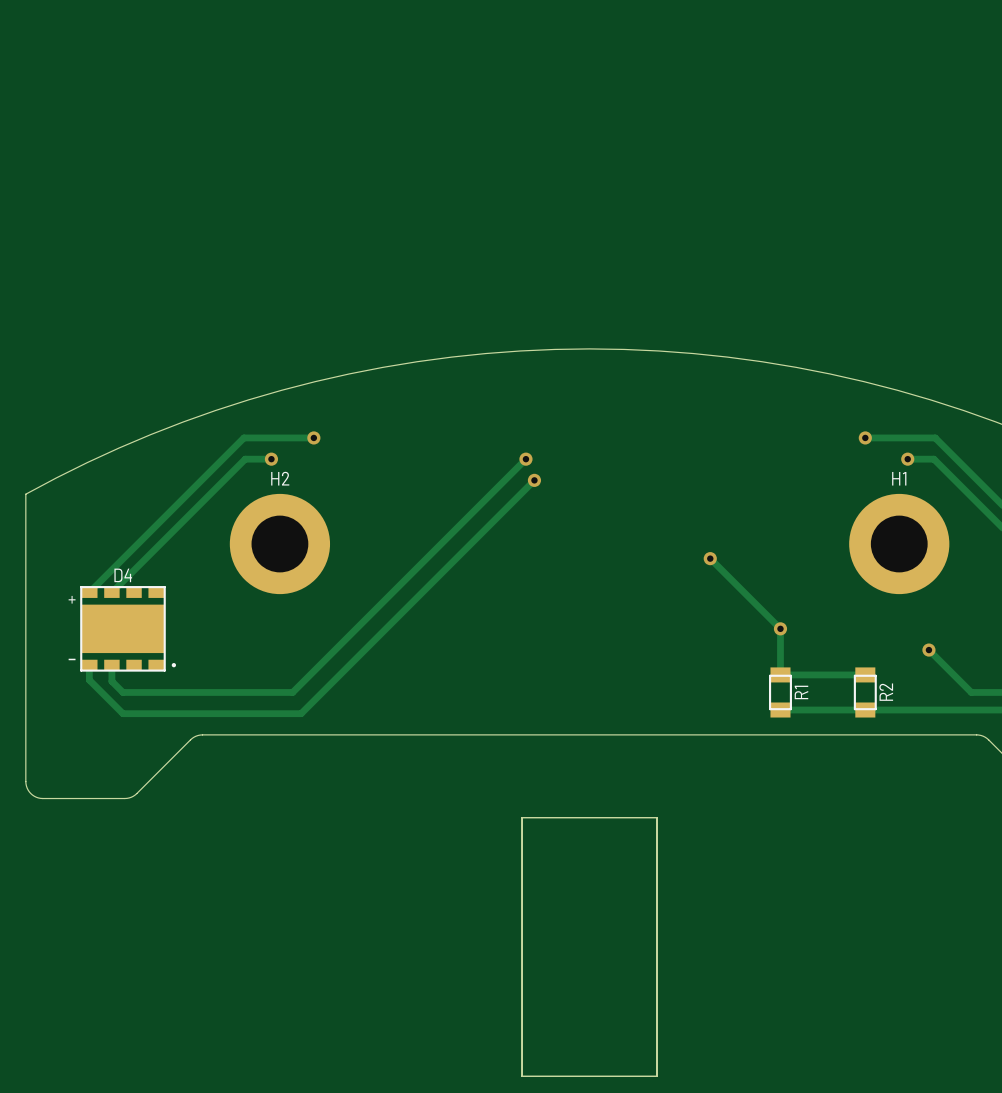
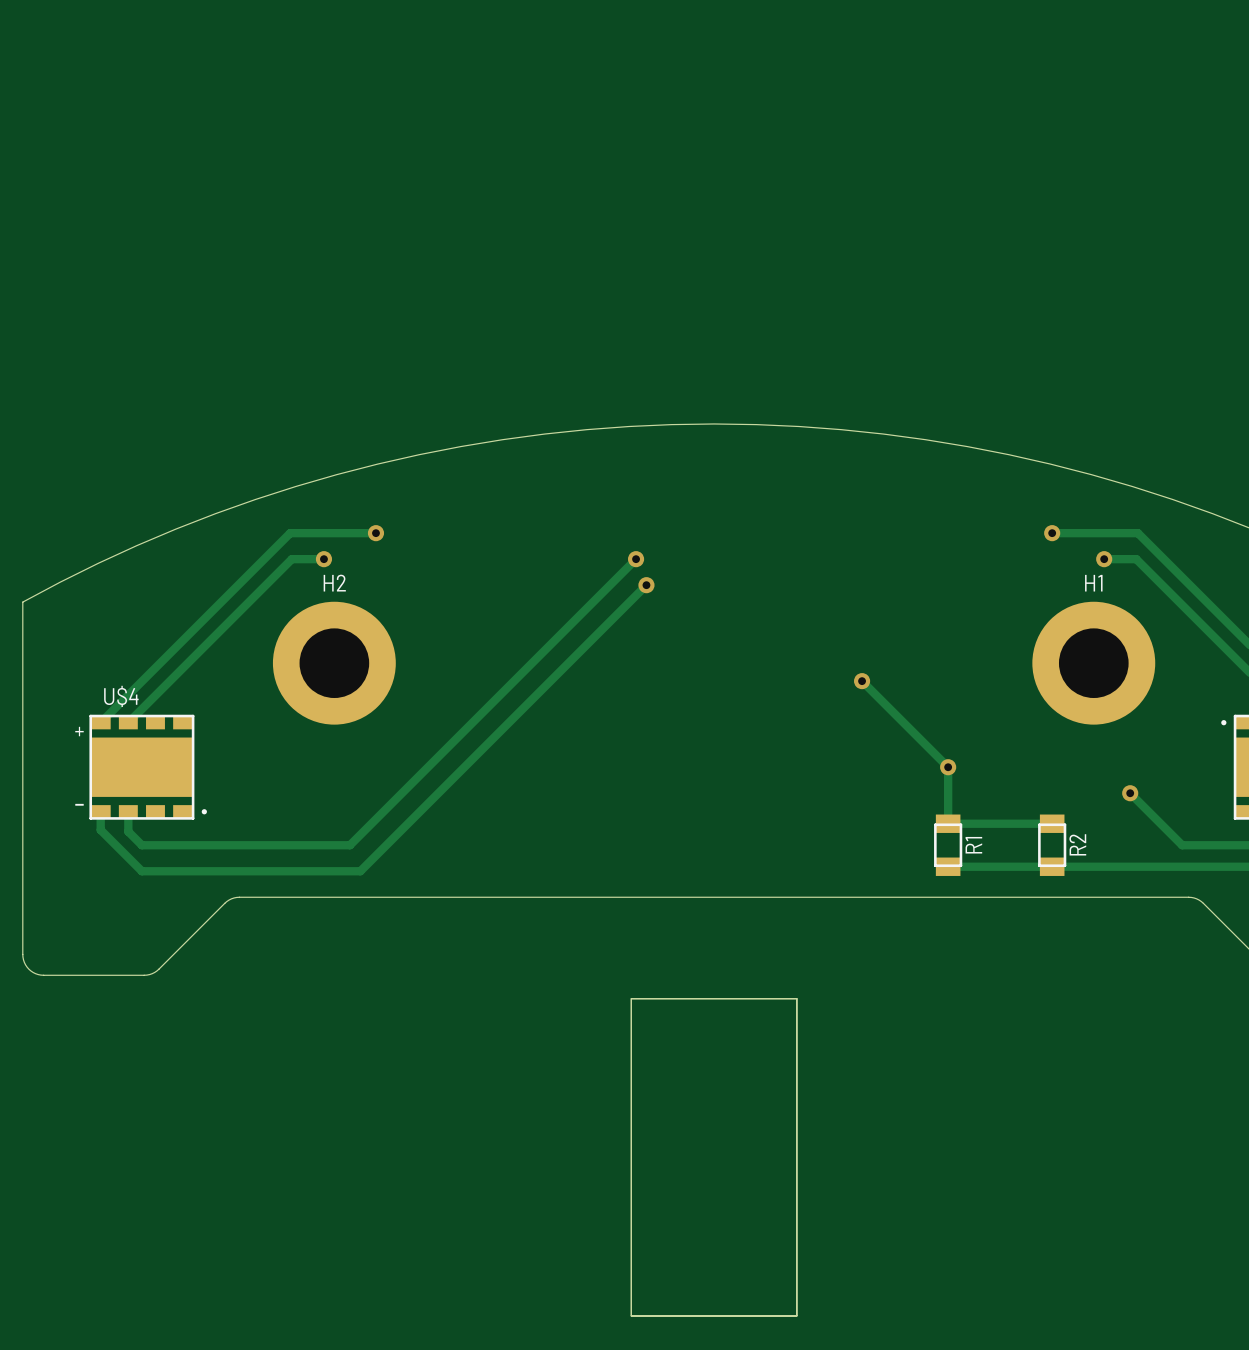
D4 name: D4 (123, 575) -> U$4 (121, 696)

